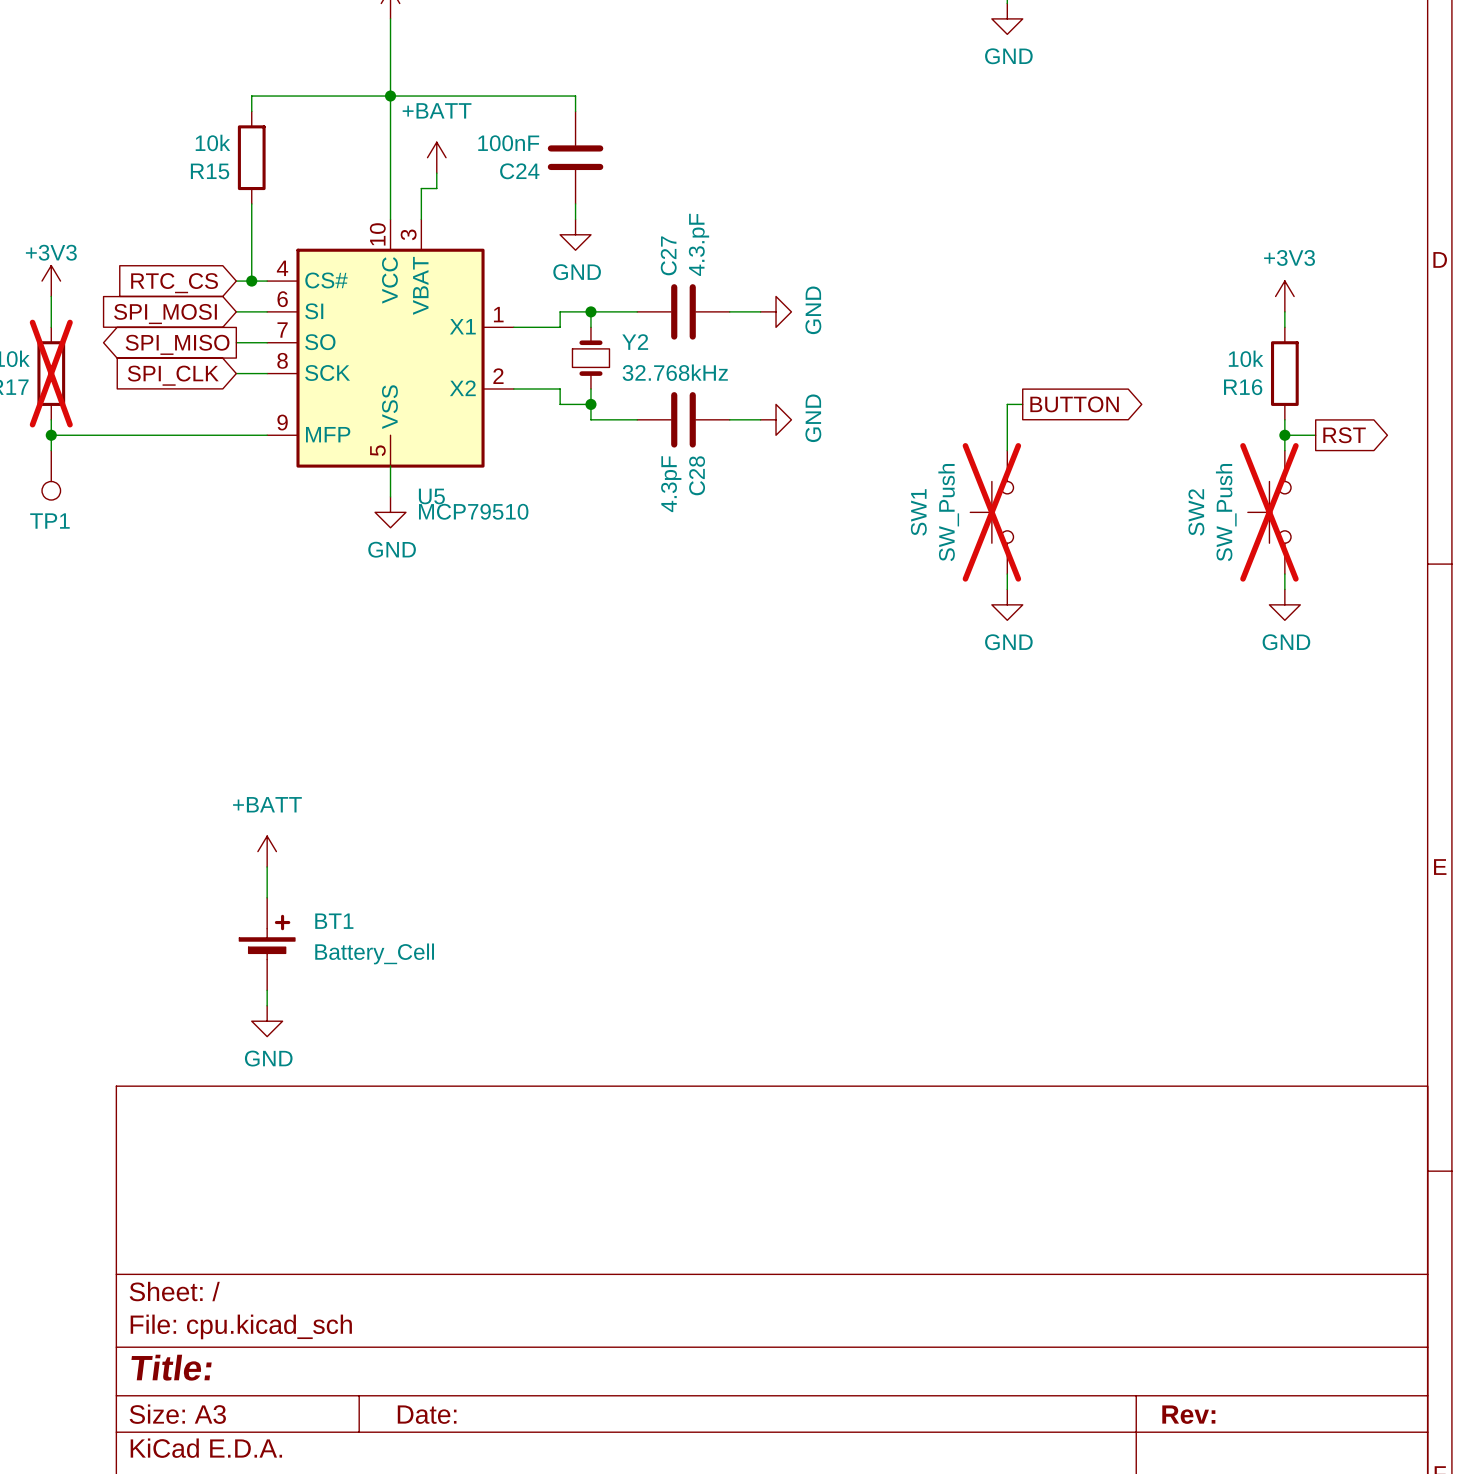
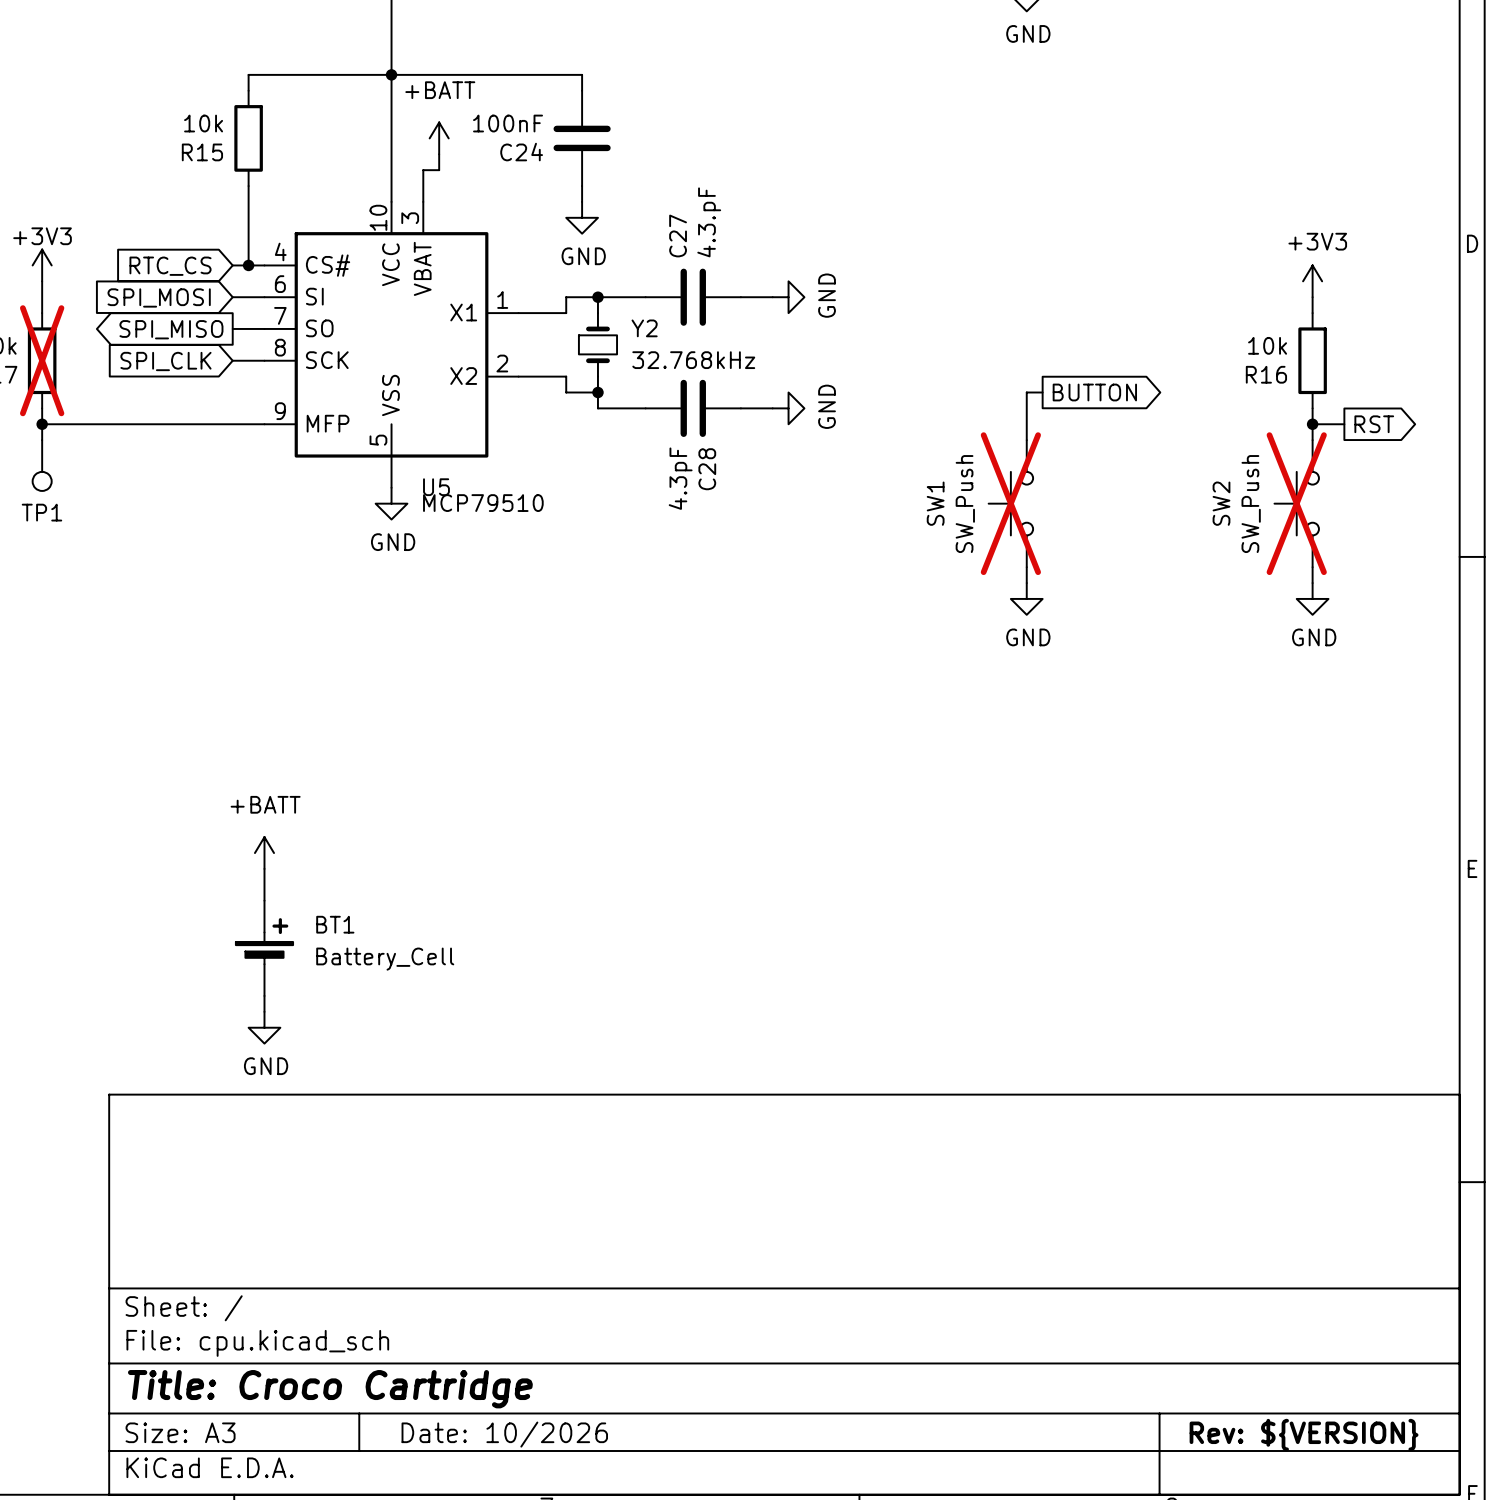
title block: Title: (171, 1367) -> Title: Croco Cartridge (330, 1389)
title block: Date: (427, 1414) -> Date: 10/2026 (504, 1434)
title block: Rev: (1188, 1414) -> Rev: ${VERSION} (1304, 1435)

